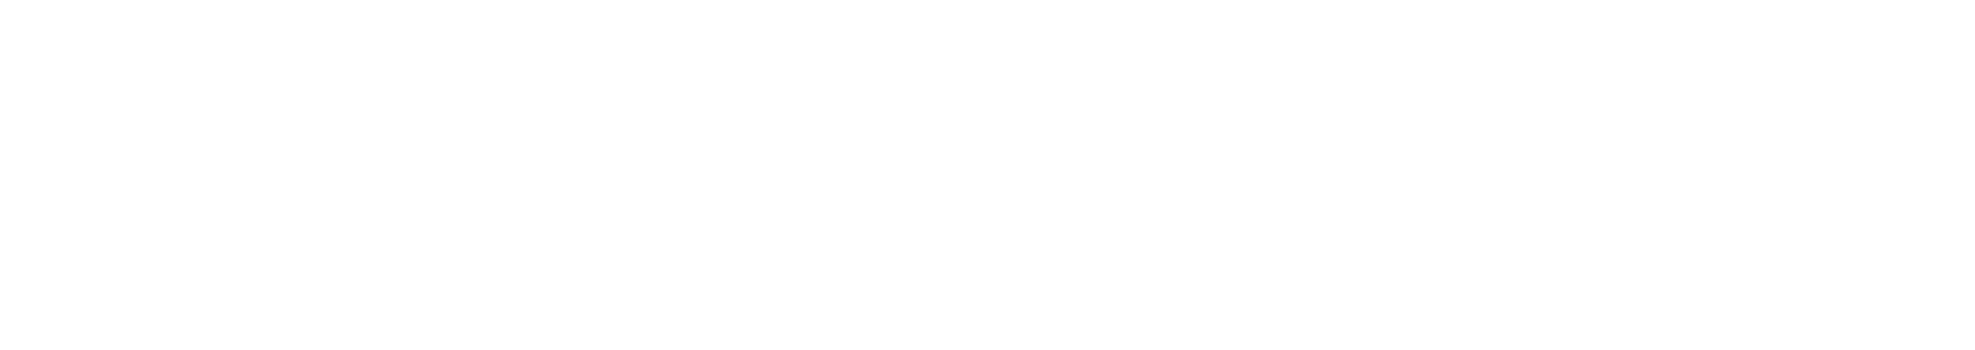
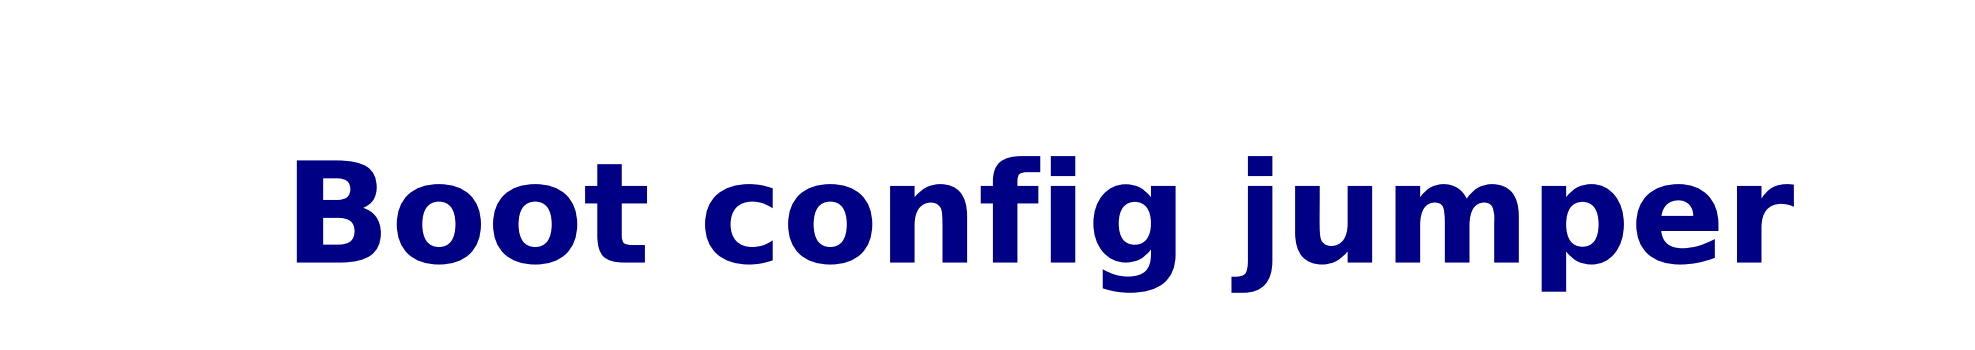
text: none -> Boot config jumper (1045, 224)

